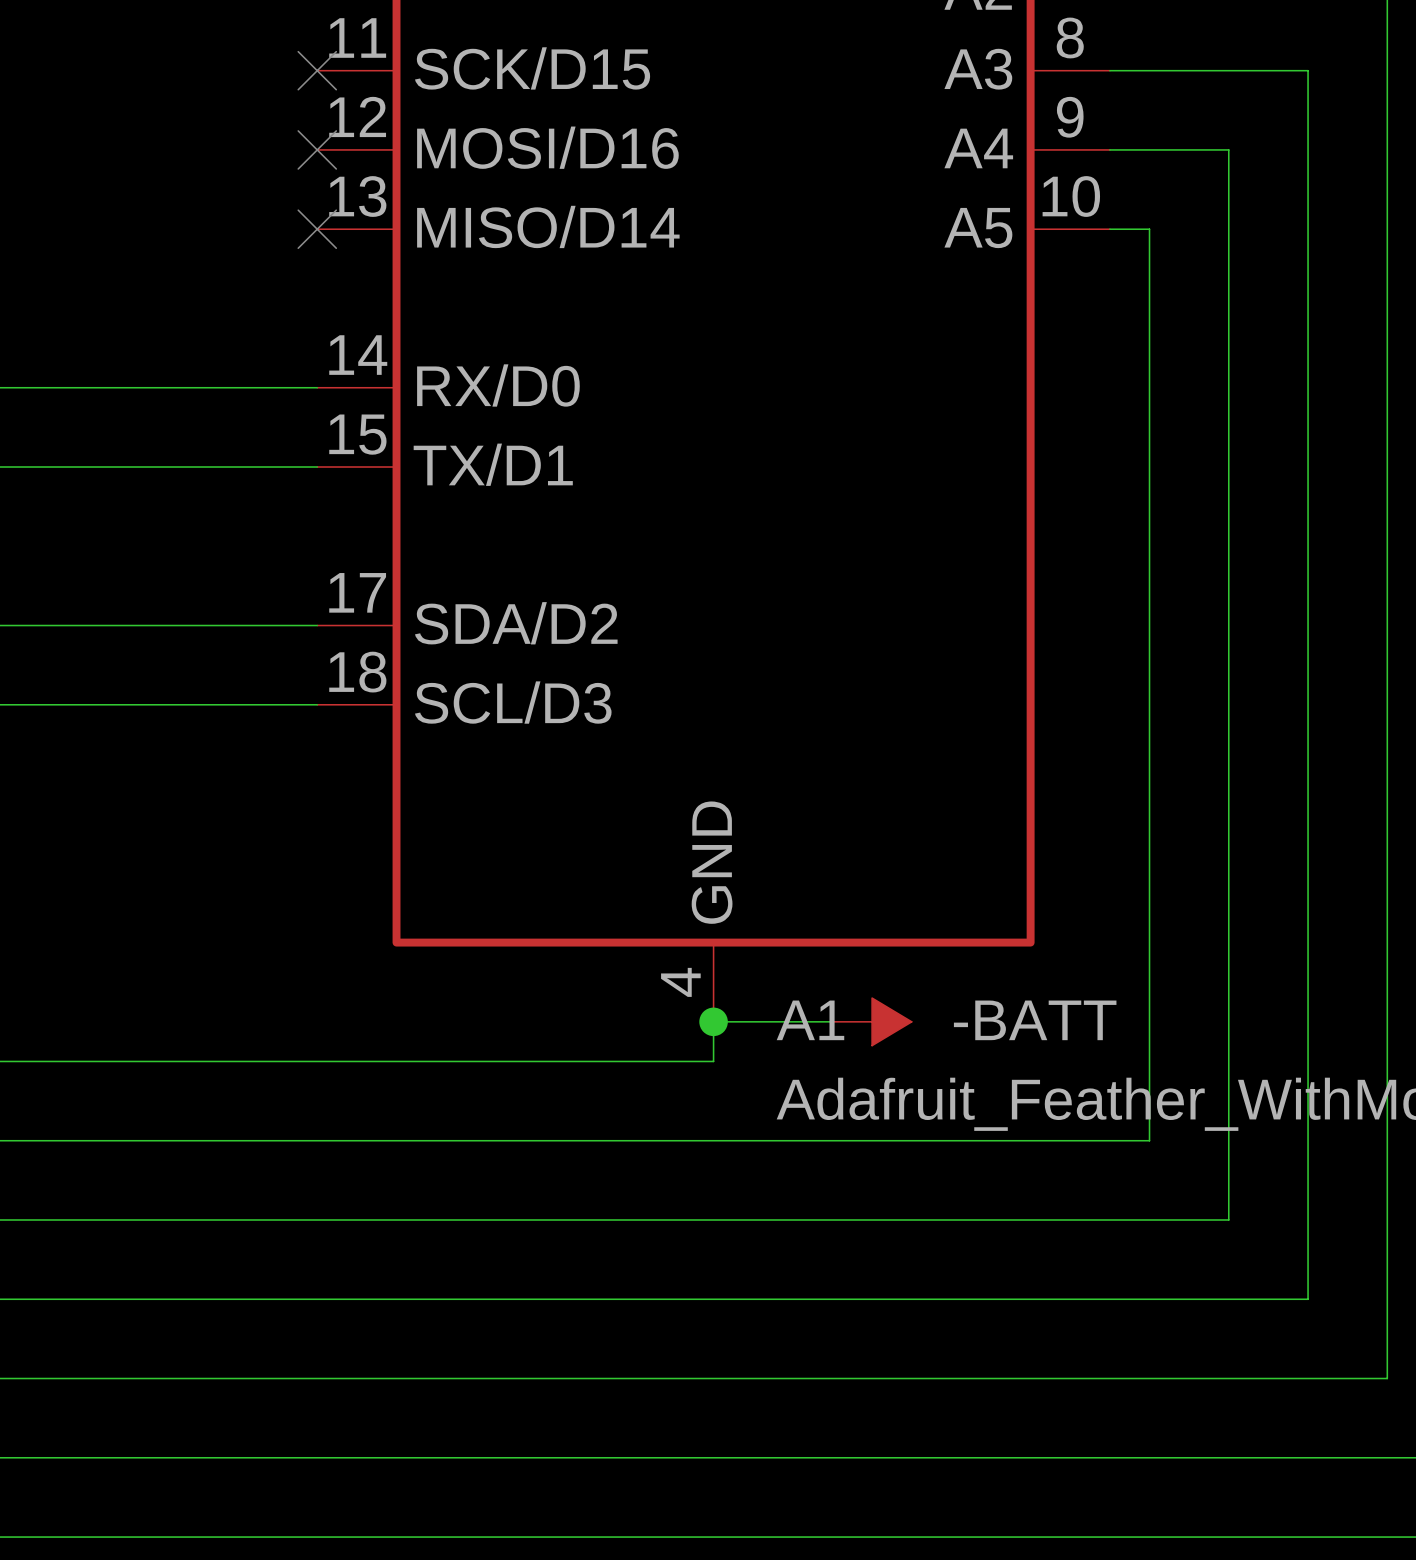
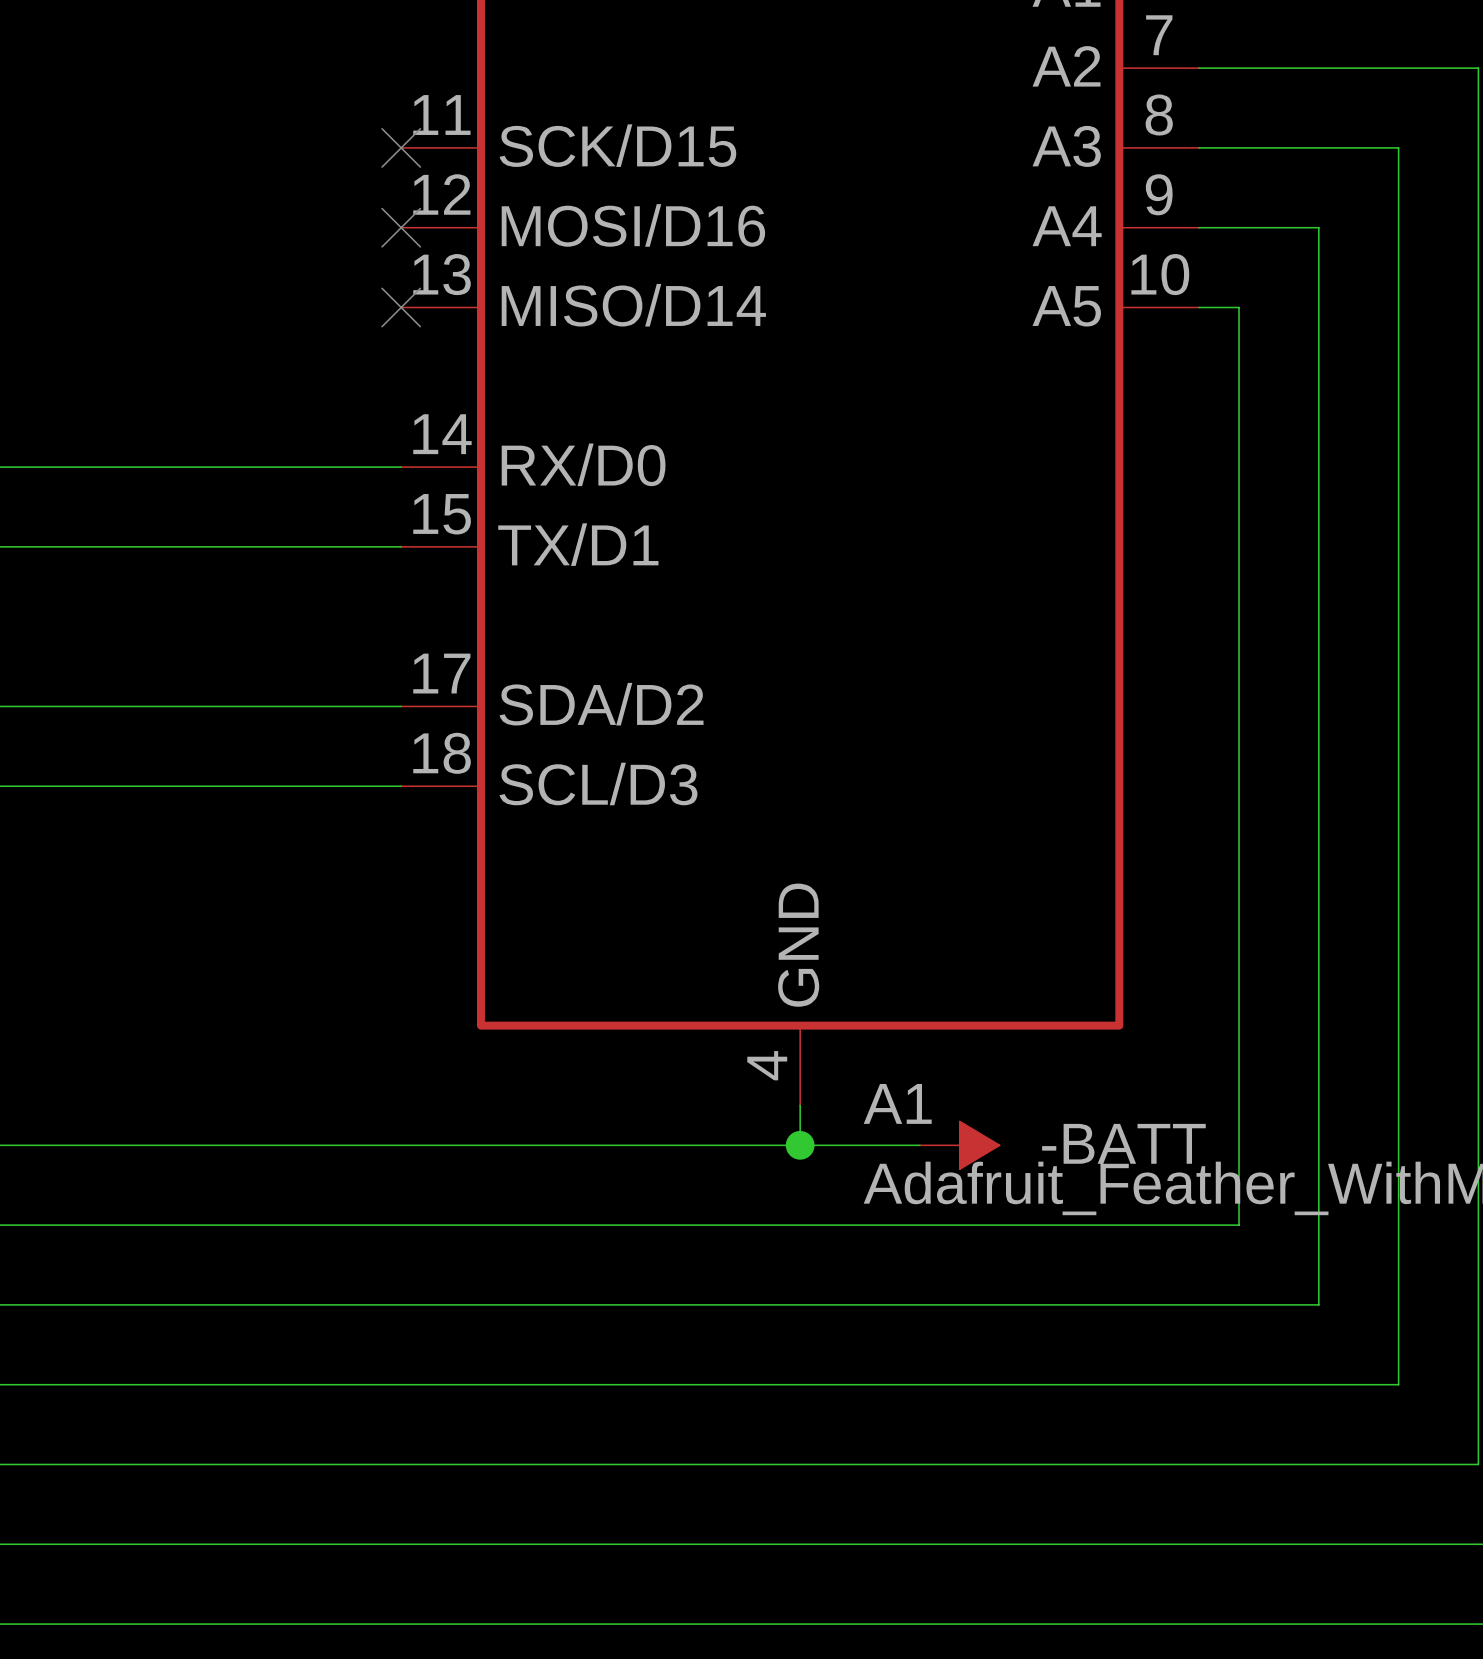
wire: (713, 1021) (832, 1021) -> (800, 1145) (919, 1145)
junction position: (713, 1021) -> (800, 1145)
power symbol position: -BATT (872, 1021) -> -BATT (959, 1145)

